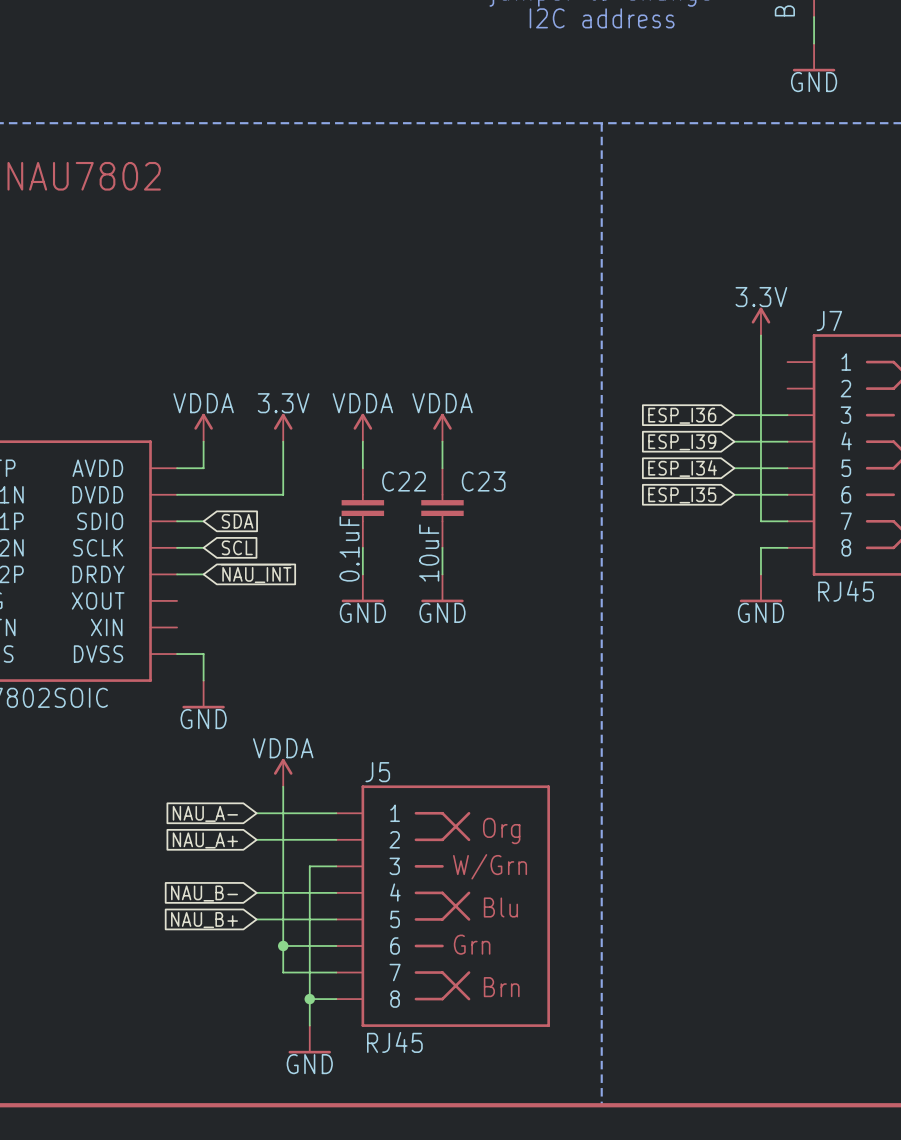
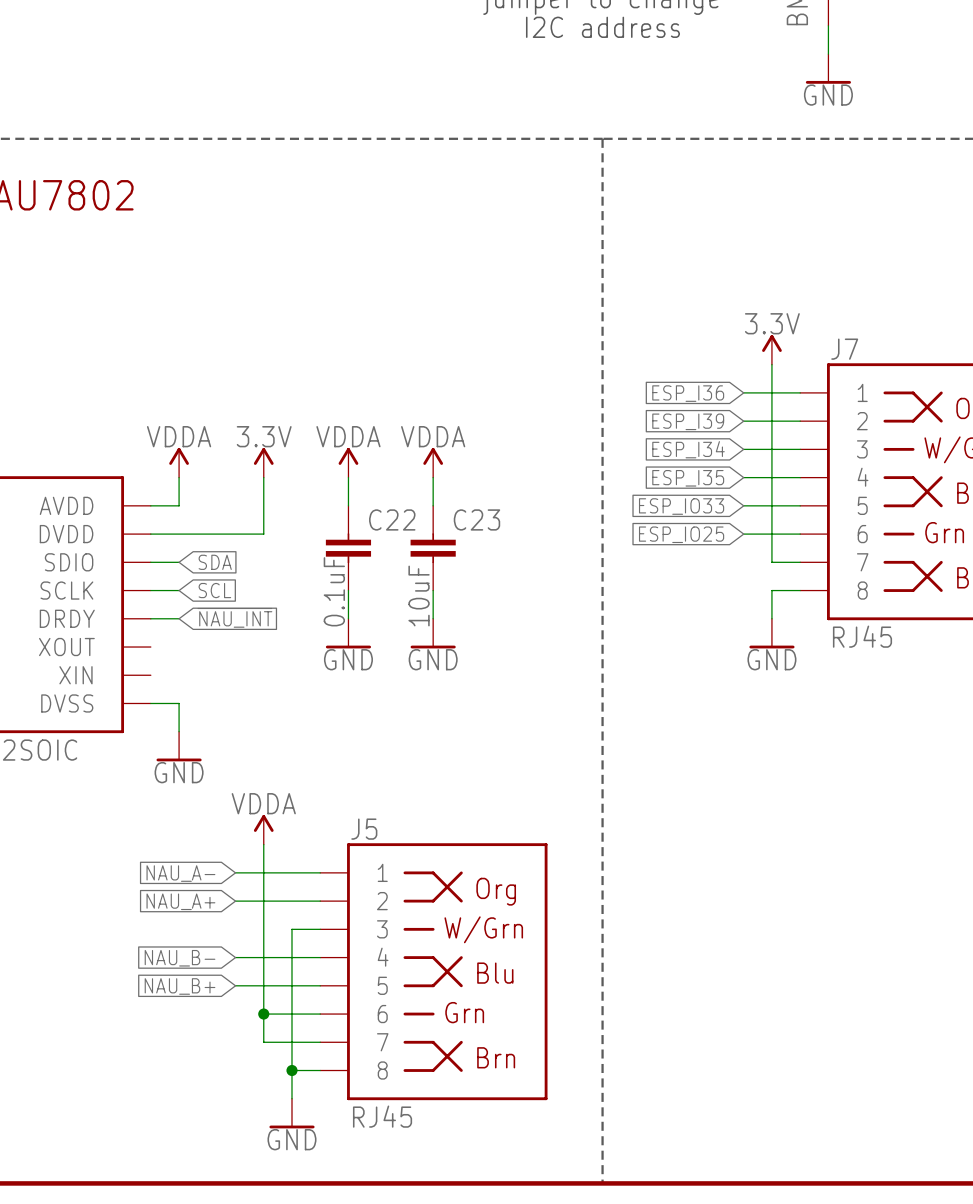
global label: none -> ESP_I36 (688, 393)
wire: none -> (743, 392) (800, 392)
wire: none -> (743, 421) (800, 421)
global label: none -> ESP_I39 (688, 421)
global label: ESP_I36 (682, 415) -> ESP_I34 (688, 449)
global label: ESP_I39 (682, 442) -> ESP_I35 (688, 478)
global label: ESP_I34 (682, 468) -> ESP_IO33 (681, 506)
global label: ESP_I35 (682, 495) -> ESP_IO25 (681, 534)

